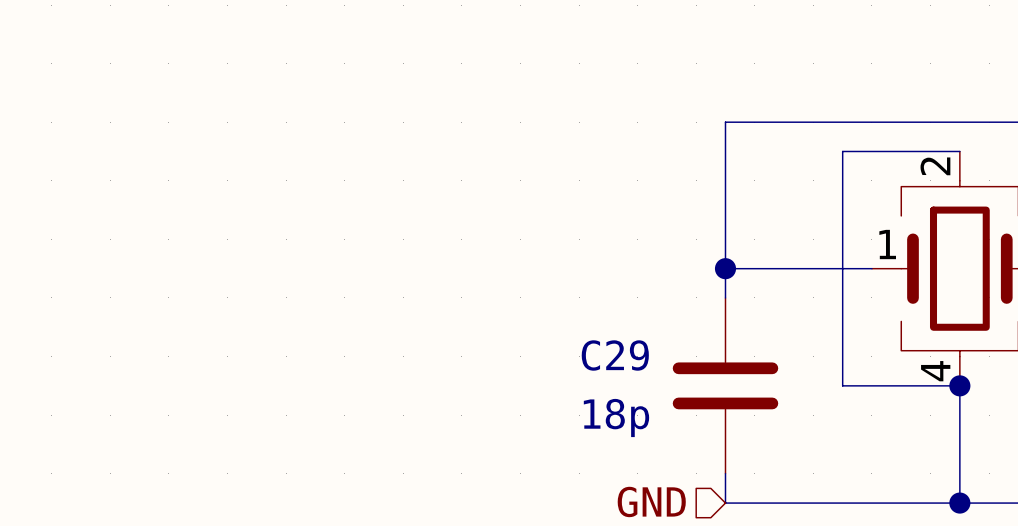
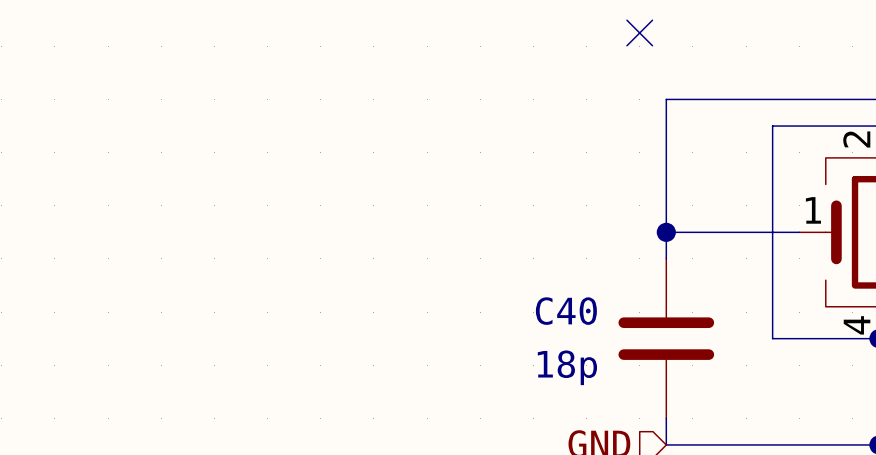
no-connect mark: none -> (639, 32)
C29 name: C29 (615, 355) -> C40 (566, 311)

